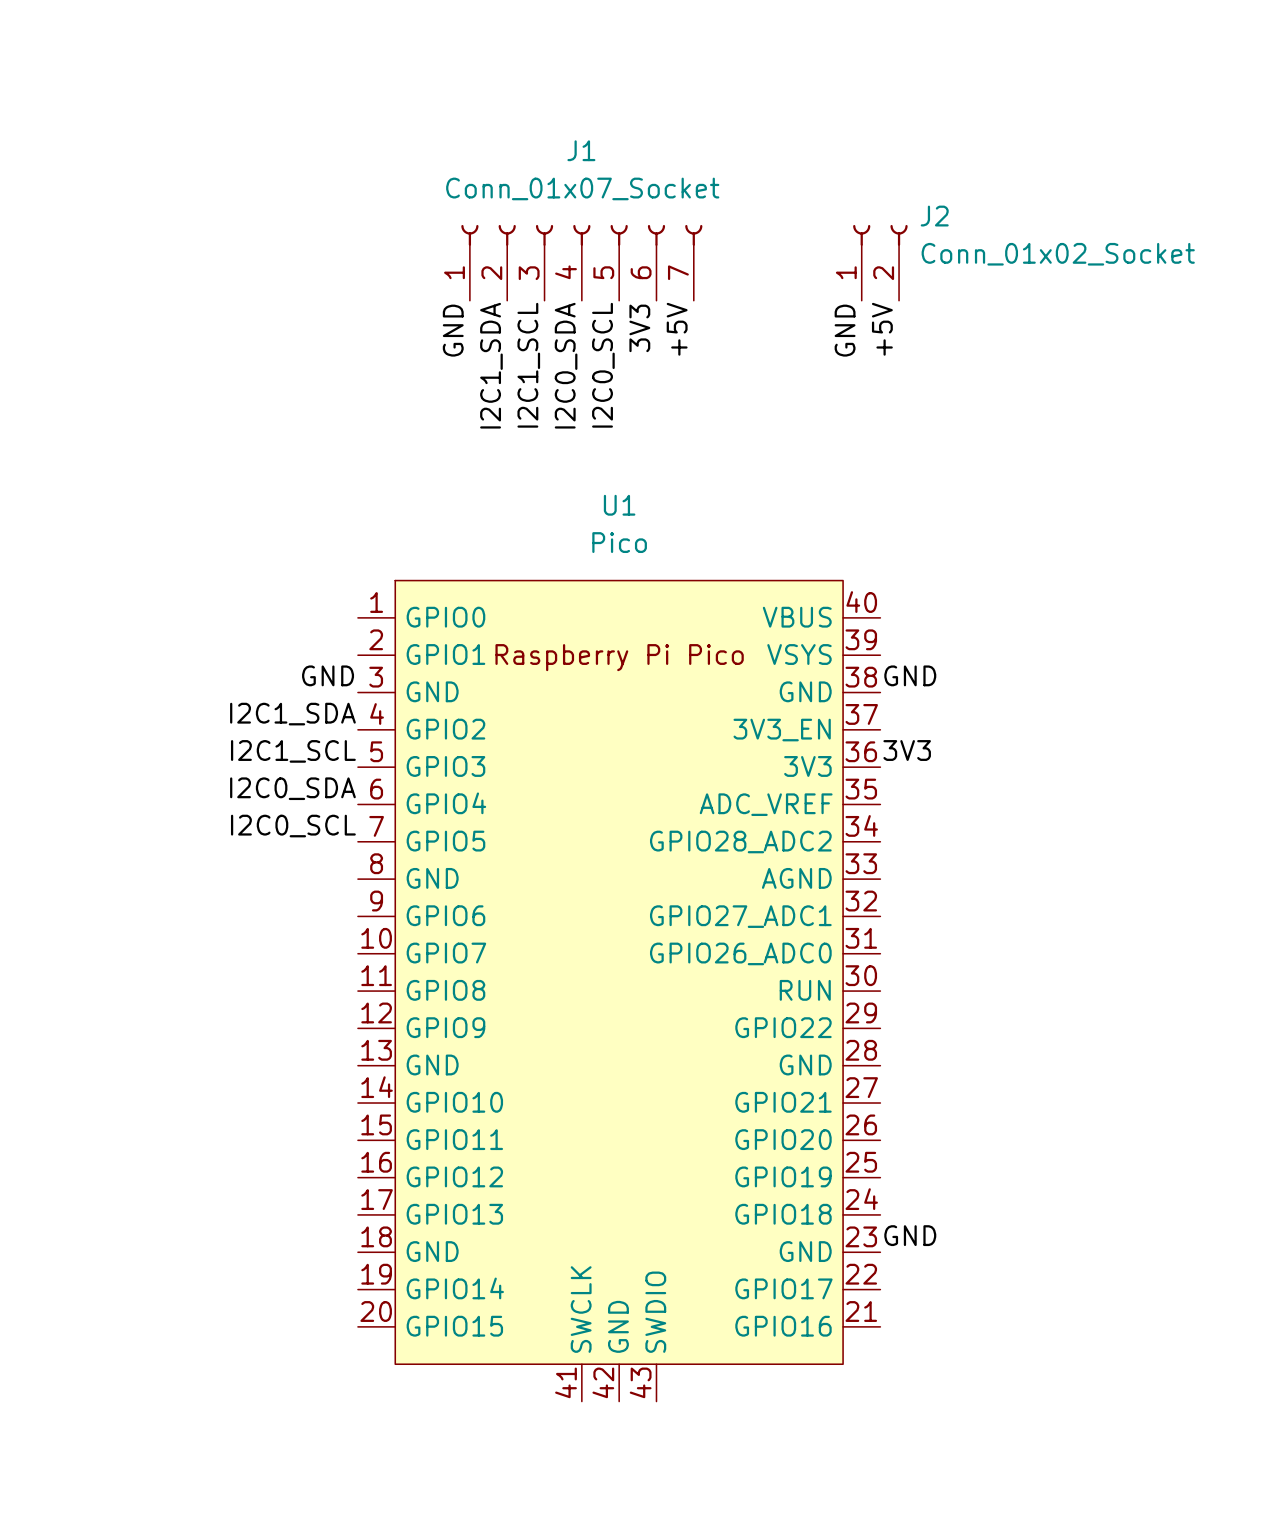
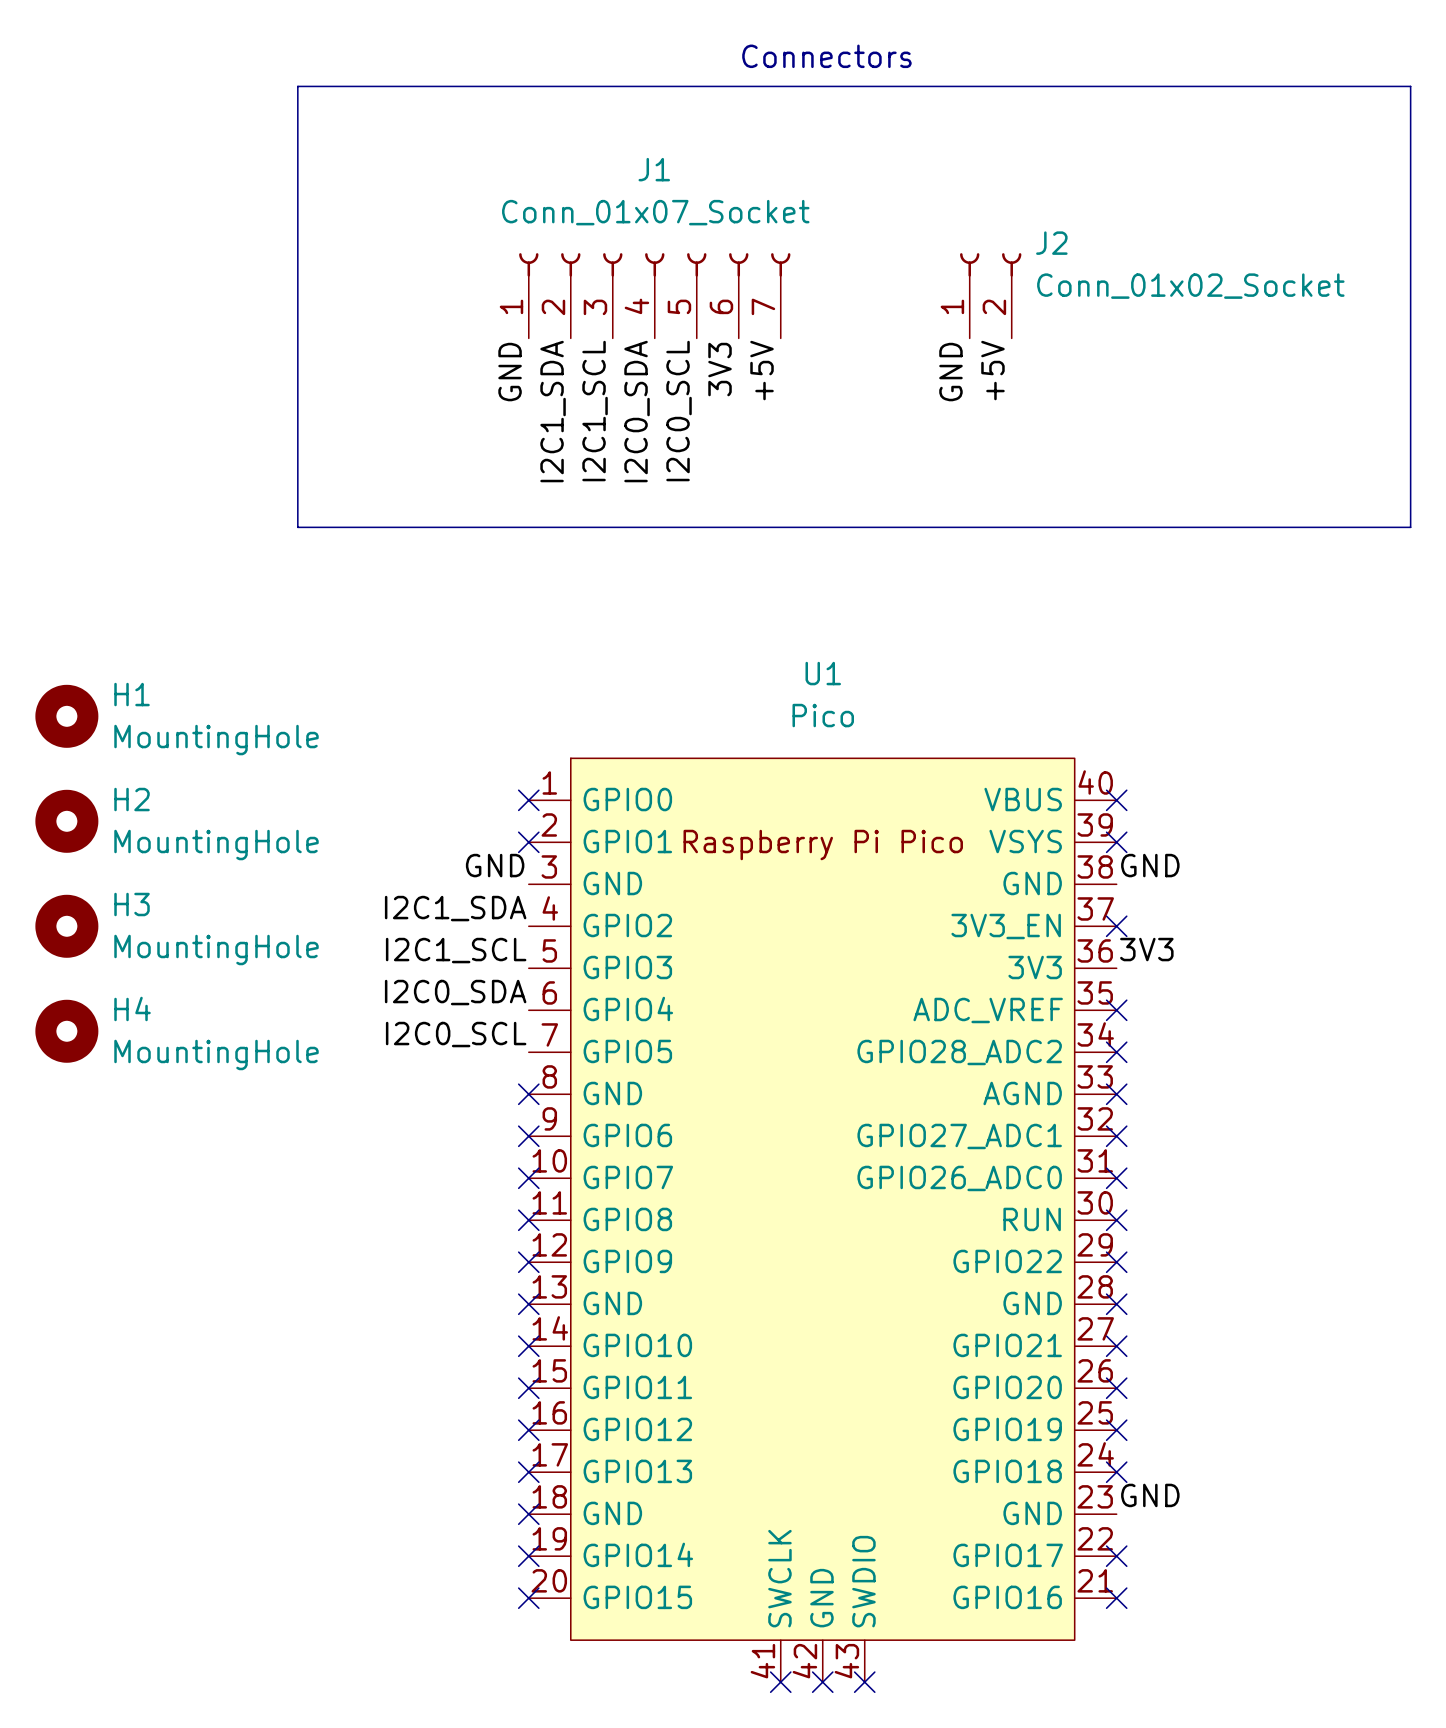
text: none -> Connectors (826, 56)
line: none -> (297, 86) (1410, 86) (1410, 527) (297, 527) (297, 86)
H1: none -> MountingHole (66, 716)
label position: GND (328, 675) -> GND (495, 865)
label position: GND (910, 675) -> GND (1150, 865)
no-connect mark: none -> (528, 800)
no-connect mark: none -> (1116, 800)
label position: I2C1_SDA (292, 714) -> I2C1_SDA (455, 908)
H2: none -> MountingHole (66, 821)
no-connect mark: none -> (528, 842)
no-connect mark: none -> (1116, 842)
label position: 3V3 (907, 750) -> 3V3 (1146, 949)
label position: I2C1_SCL (293, 751) -> I2C1_SCL (456, 950)
label position: I2C0_SDA (292, 788) -> I2C0_SDA (455, 992)
H3: none -> MountingHole (66, 926)
no-connect mark: none -> (1116, 926)
label position: I2C0_SCL (293, 826) -> I2C0_SCL (456, 1034)
no-connect mark: none -> (1116, 1010)
H4: none -> MountingHole (66, 1031)
no-connect mark: none -> (1116, 1052)
no-connect mark: none -> (528, 1094)
no-connect mark: none -> (1116, 1094)
U1 position: (619, 991) -> (822, 1220)
no-connect mark: none -> (528, 1136)
no-connect mark: none -> (1116, 1136)
no-connect mark: none -> (528, 1178)
no-connect mark: none -> (1116, 1178)
no-connect mark: none -> (528, 1220)
no-connect mark: none -> (1116, 1220)
no-connect mark: none -> (528, 1262)
no-connect mark: none -> (1116, 1262)
no-connect mark: none -> (528, 1304)
no-connect mark: none -> (1116, 1304)
no-connect mark: none -> (528, 1346)
no-connect mark: none -> (1116, 1346)
no-connect mark: none -> (528, 1388)
no-connect mark: none -> (1116, 1388)
label position: GND (910, 1235) -> GND (1150, 1495)
no-connect mark: none -> (528, 1430)
no-connect mark: none -> (1116, 1430)
no-connect mark: none -> (528, 1472)
no-connect mark: none -> (1116, 1472)
no-connect mark: none -> (528, 1514)
no-connect mark: none -> (528, 1556)
no-connect mark: none -> (1116, 1556)
no-connect mark: none -> (528, 1598)
no-connect mark: none -> (1116, 1598)
no-connect mark: none -> (780, 1682)
no-connect mark: none -> (822, 1682)
no-connect mark: none -> (864, 1682)

